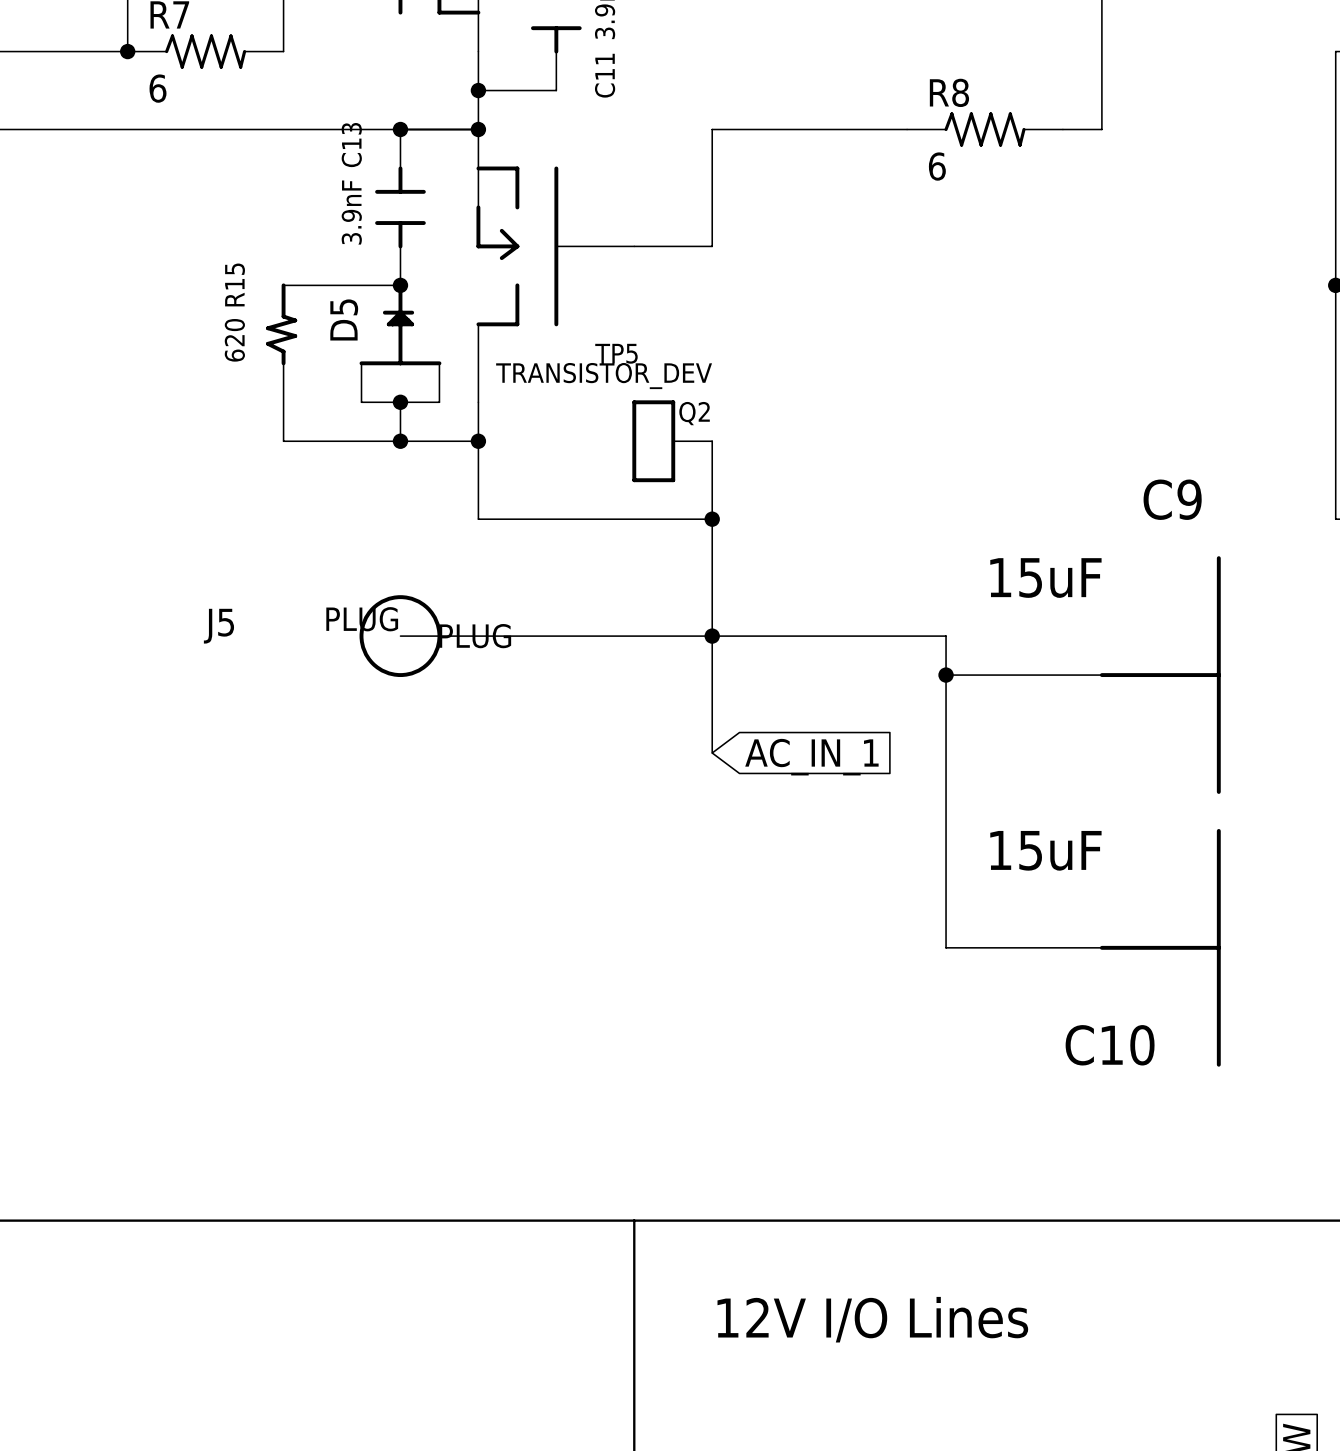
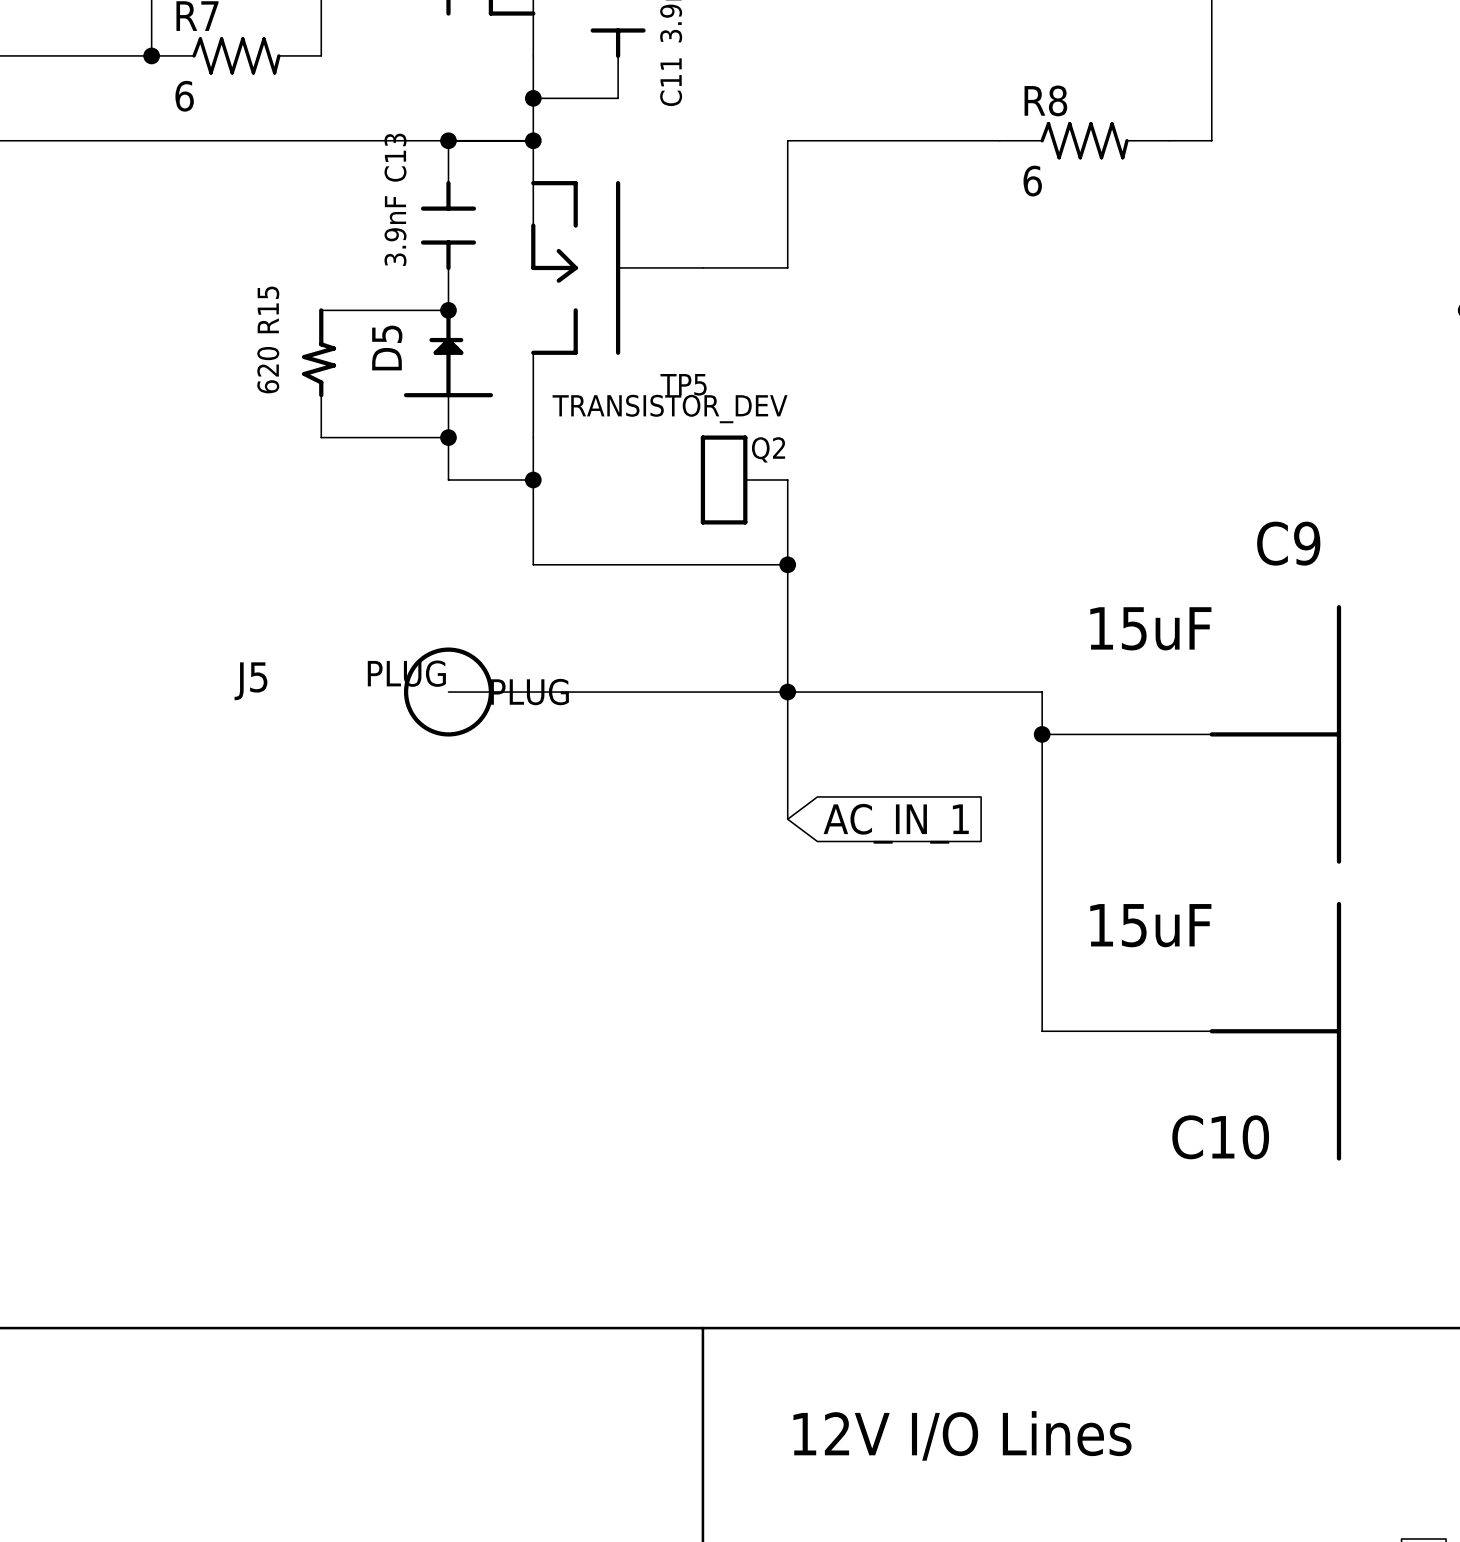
wire: (361, 363) (361, 402) -> none
wire: (439, 363) (439, 402) (400, 402) -> (448, 395) (448, 437)
wire: (283, 402) (283, 441) (400, 441) -> (321, 437) (406, 437)
junction: (400, 441) -> none

